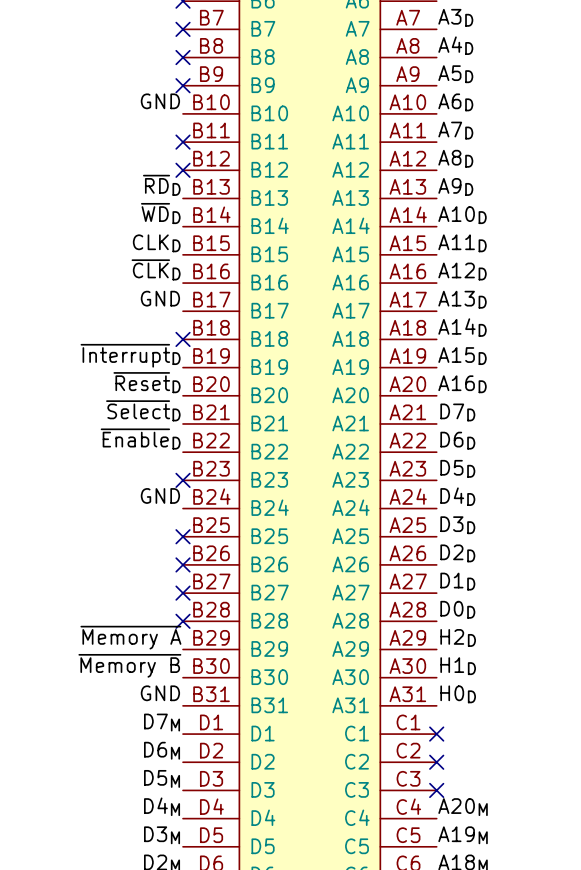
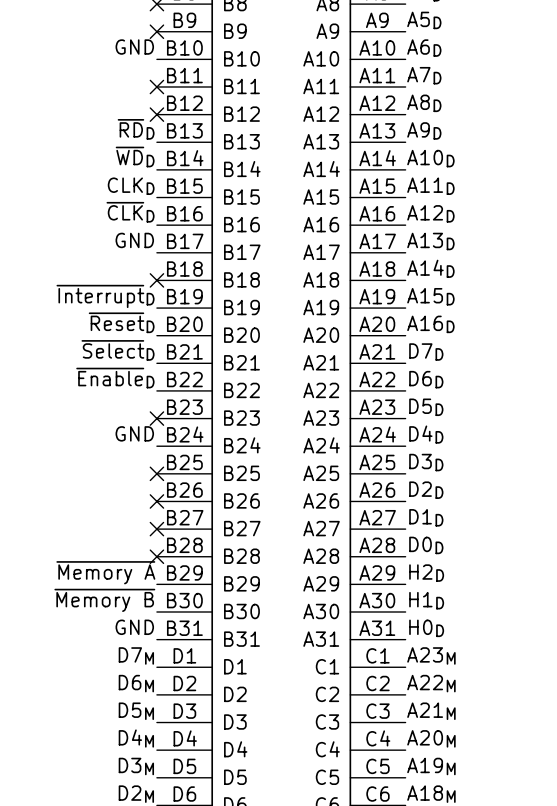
label: none -> A23M (431, 655)
no-connect mark: (436, 734) -> none
label: none -> A22M (431, 683)
no-connect mark: (436, 762) -> none
label: none -> A21M (431, 711)
no-connect mark: (436, 790) -> none

